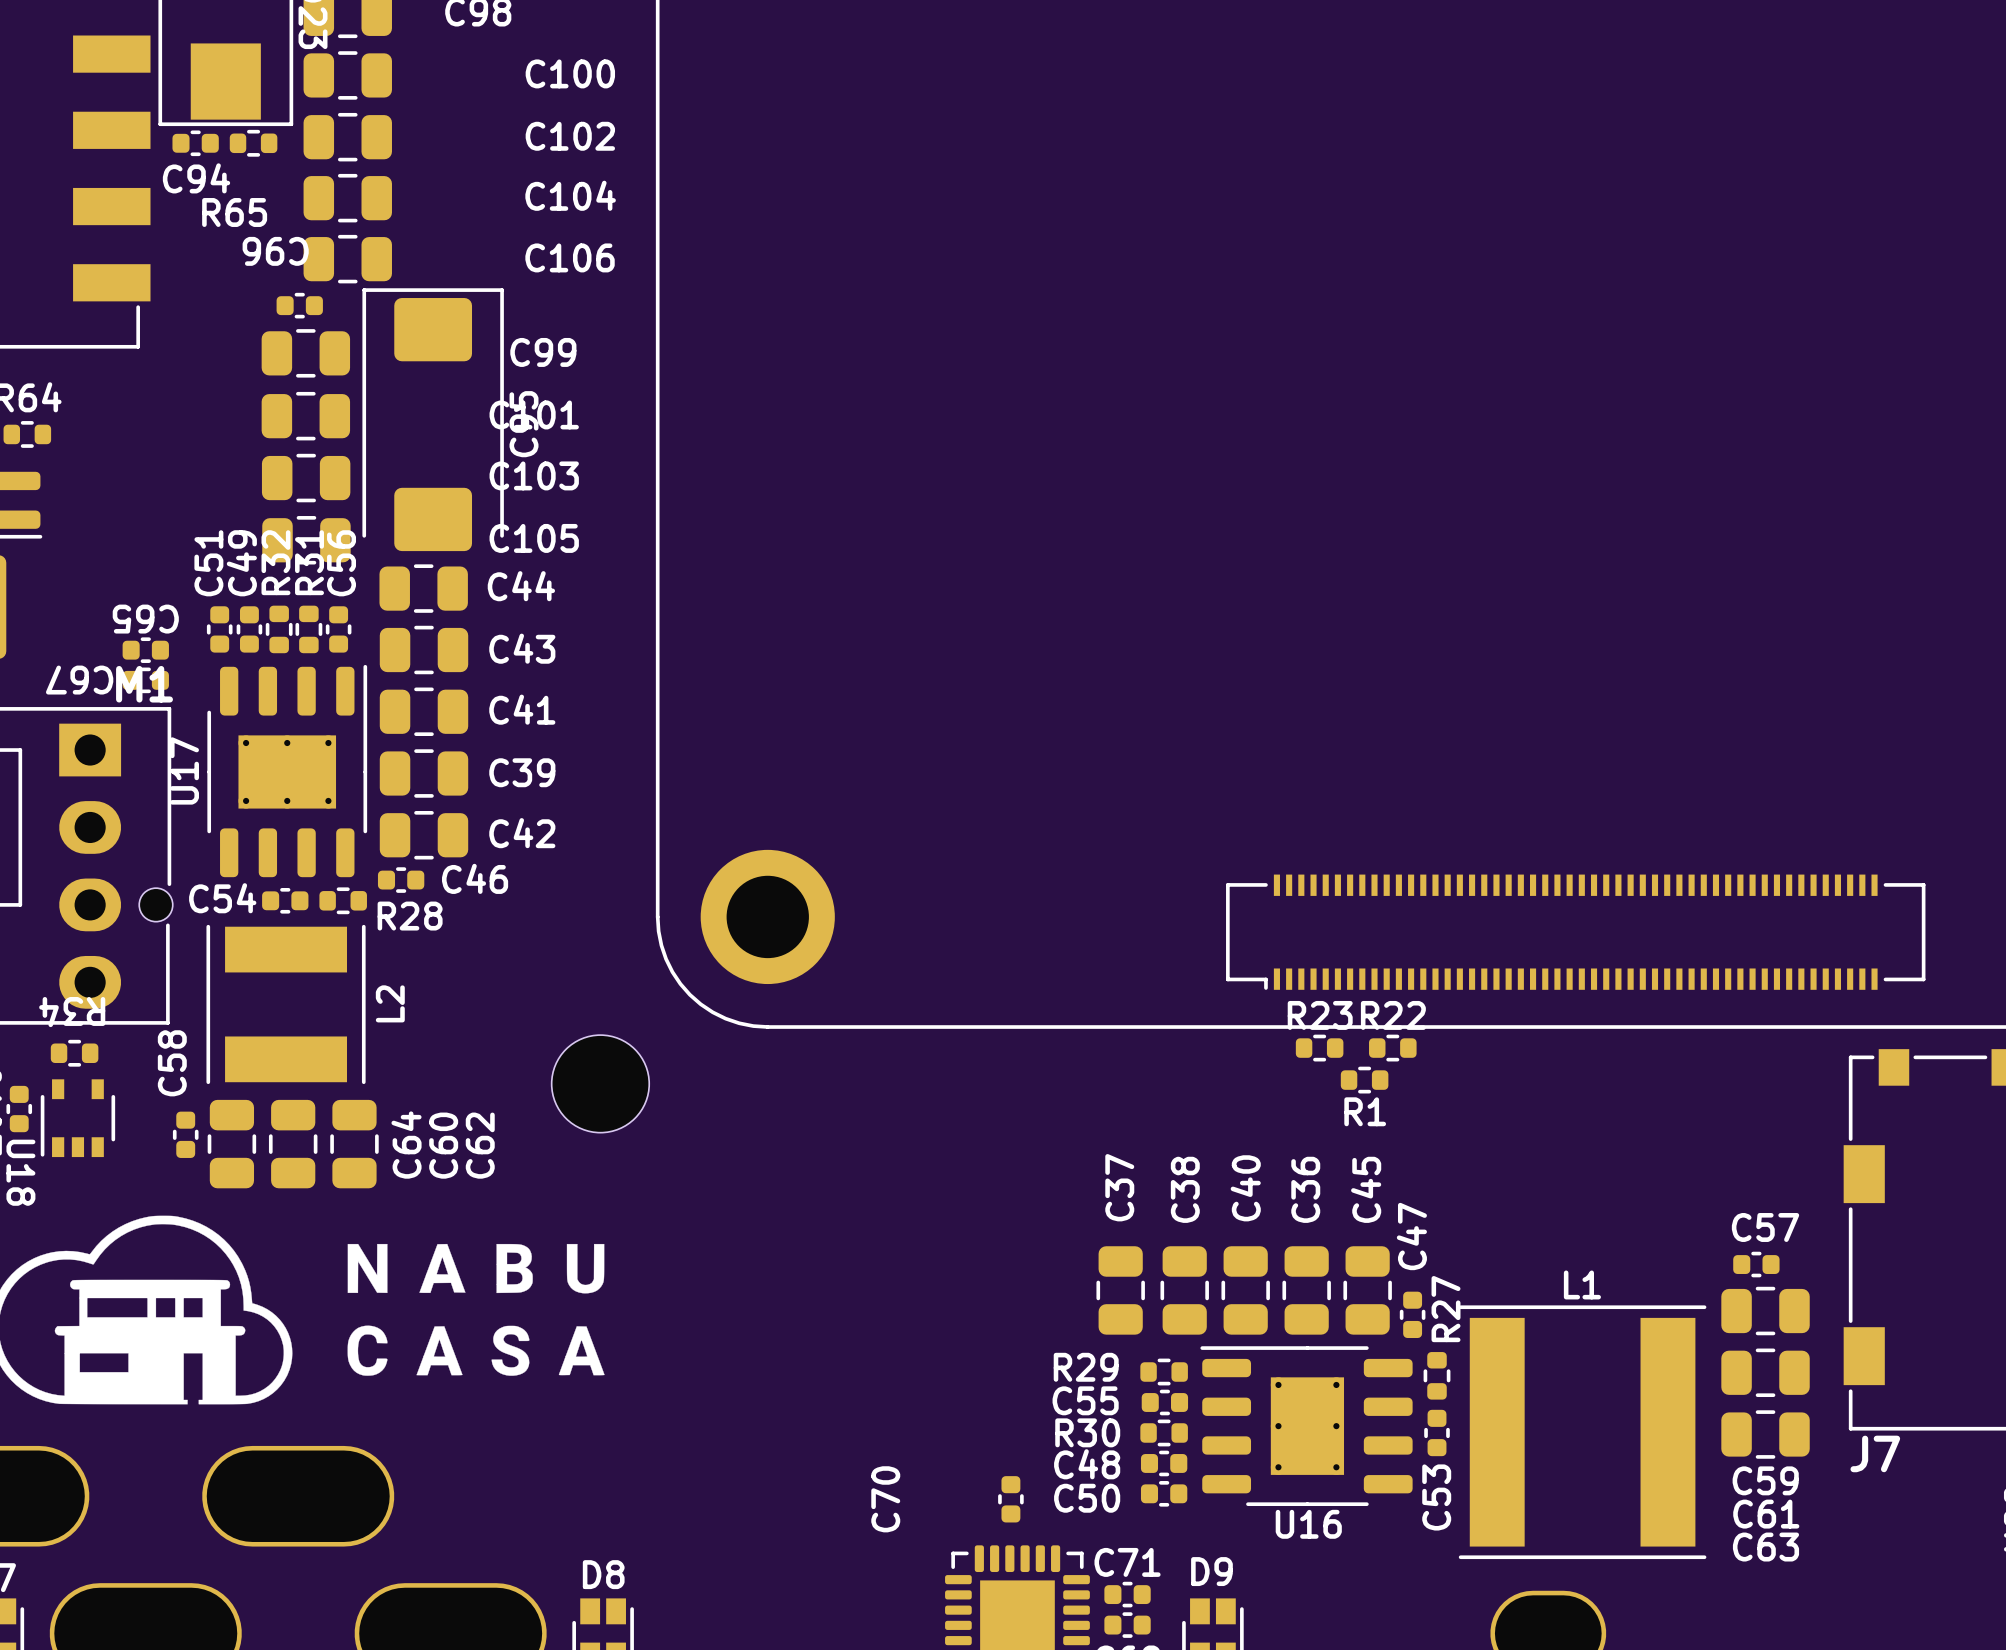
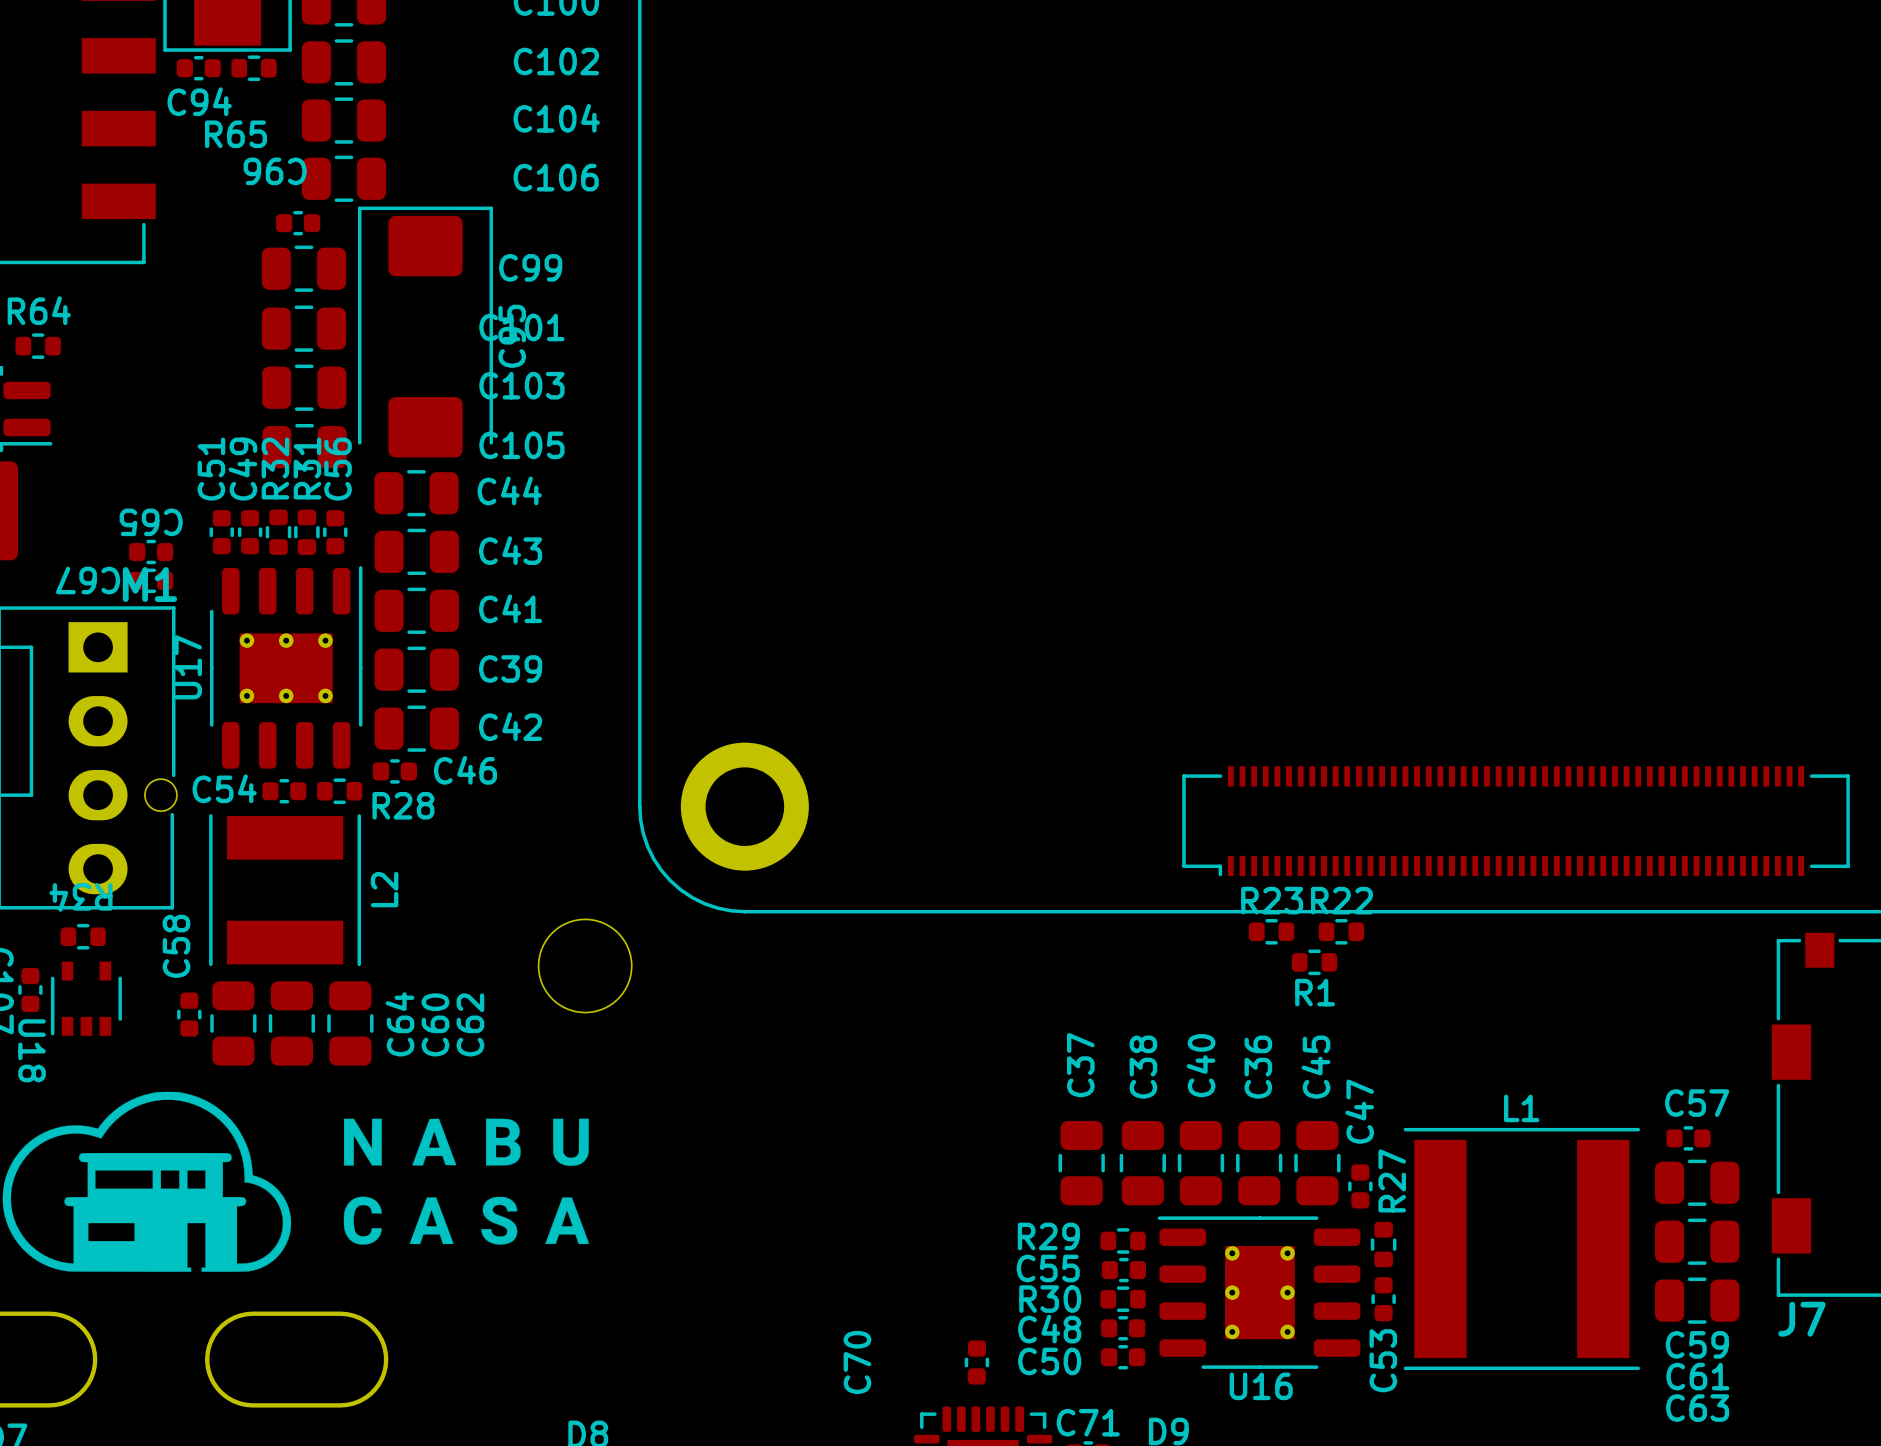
L1 position: (1582, 1432) -> (1521, 1248)

